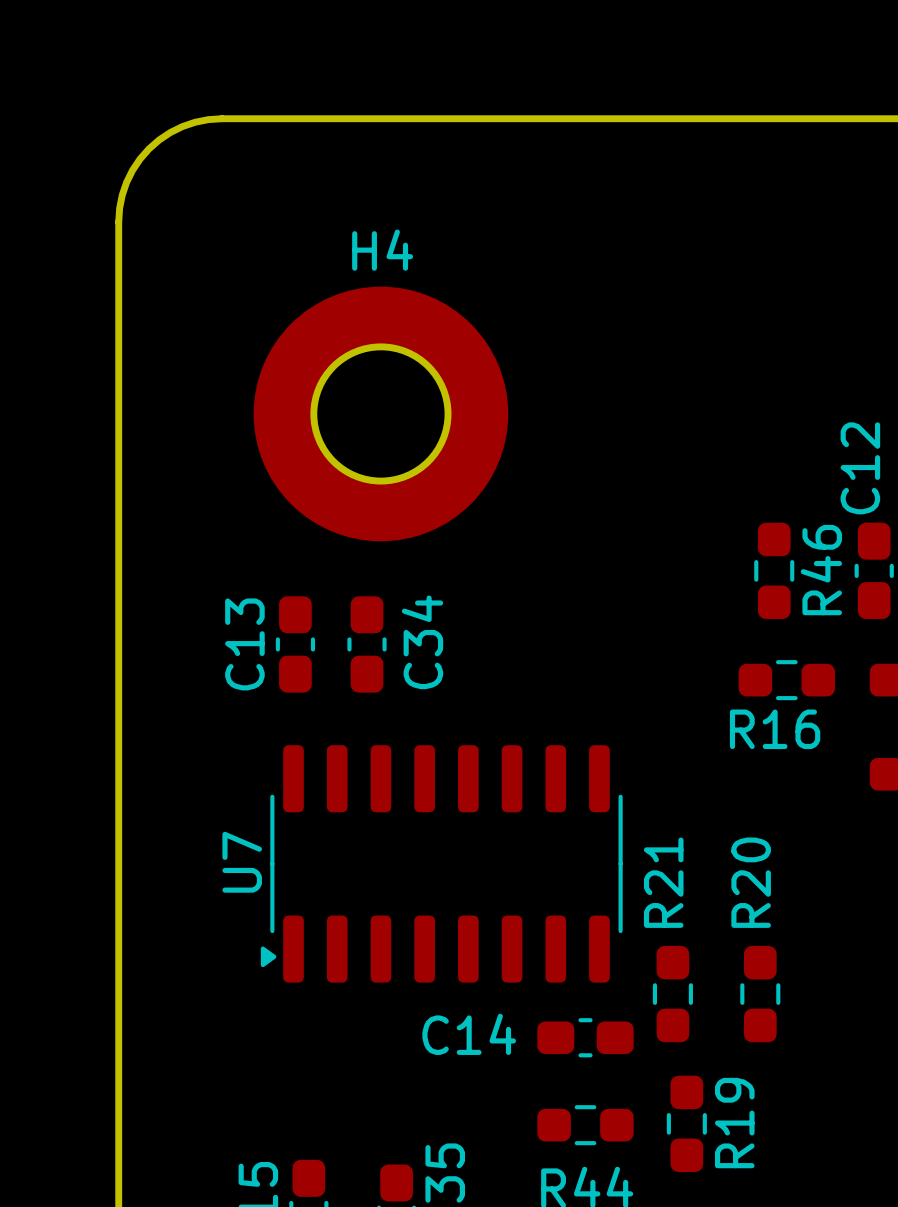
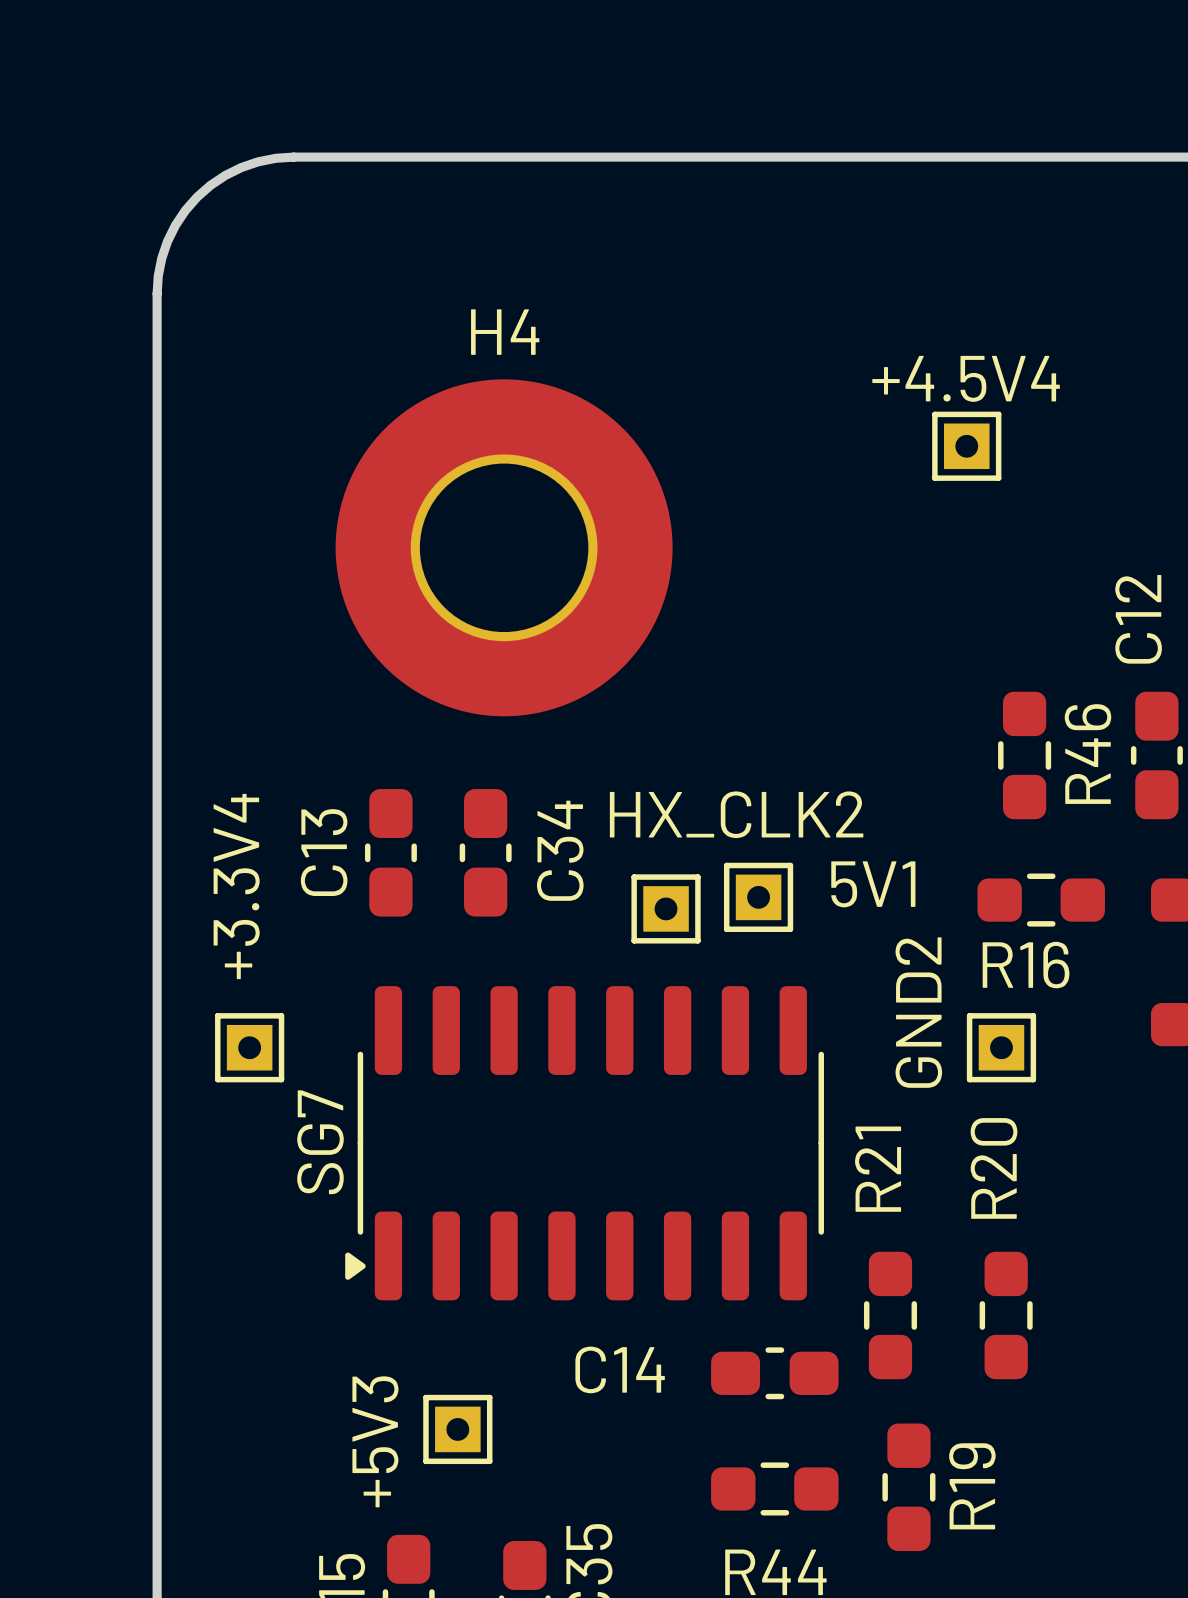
+4.5V4: none -> (966, 446)
5V1: none -> (758, 897)
HX_CLK2: none -> (666, 908)
+3.3V4: none -> (249, 1047)
GND2: none -> (1001, 1047)
U7 name: U7 (242, 862) -> SG7 (320, 1142)
+5V3: none -> (457, 1429)

